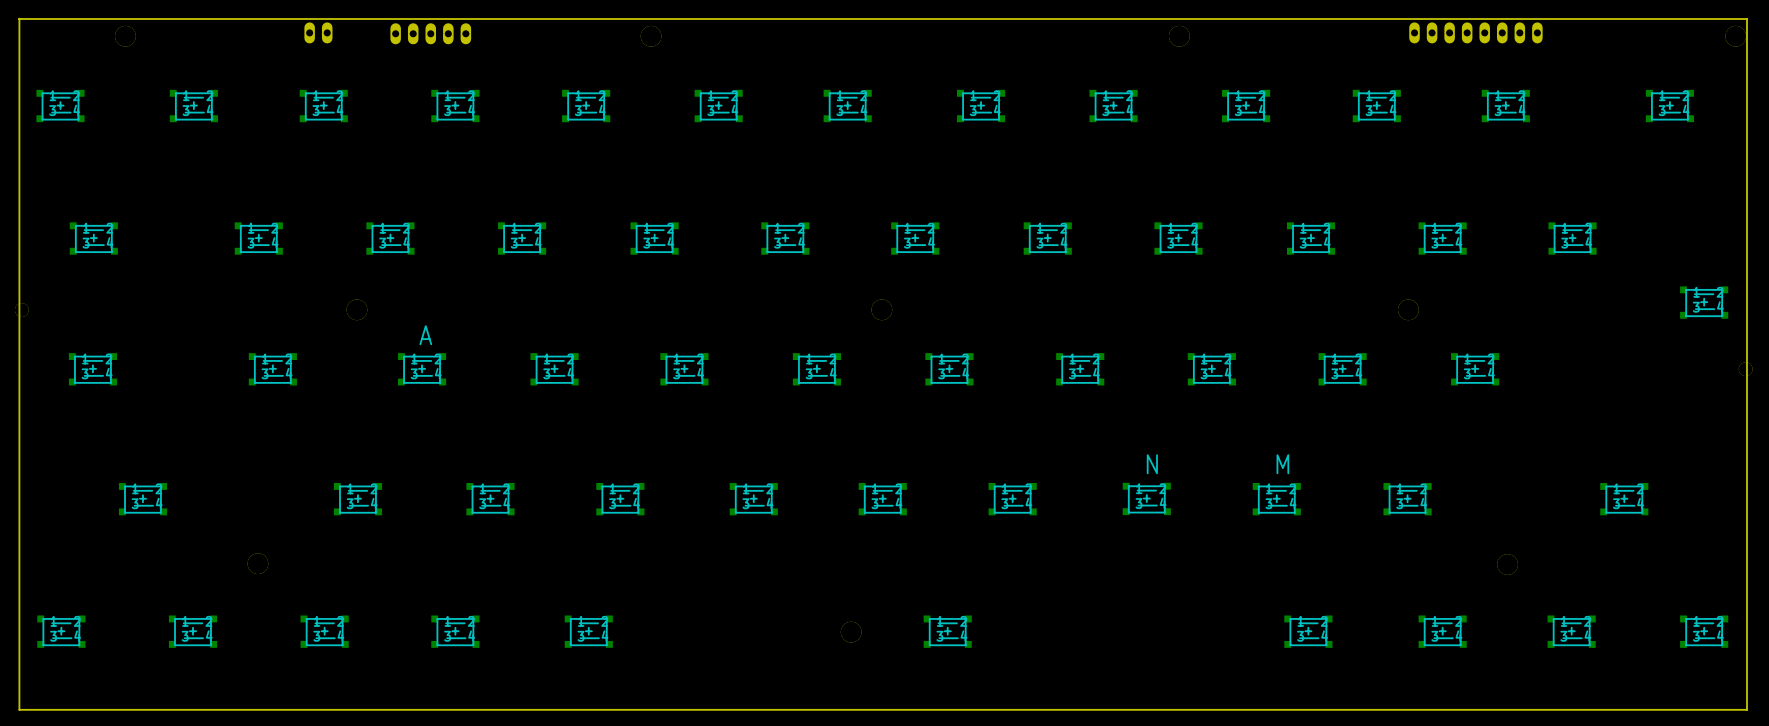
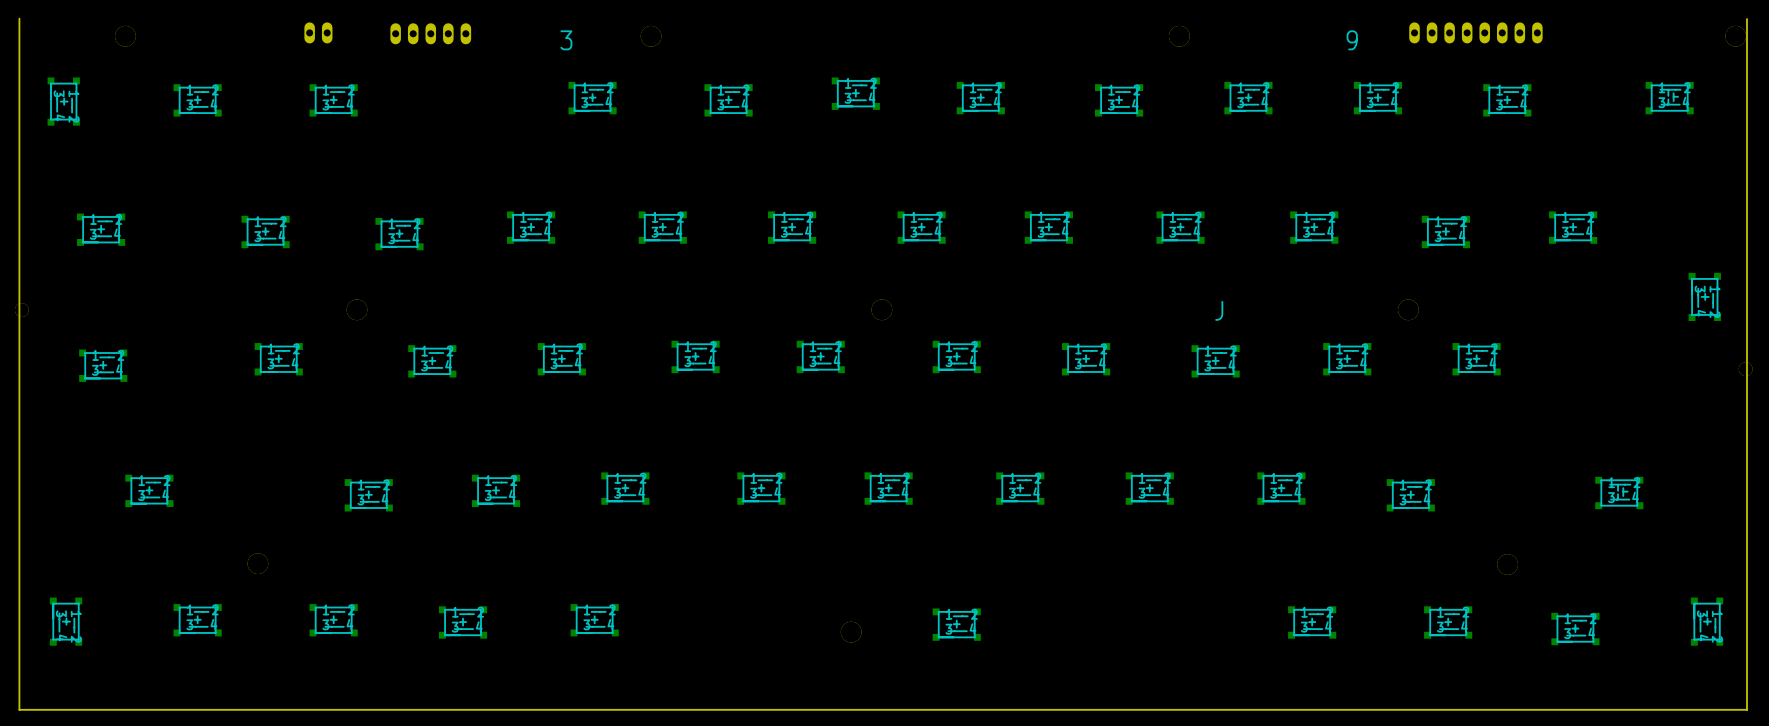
board edge: (1746, 19) (19, 19) -> none
part footprint: [36, 89, 85, 123] -> [47, 77, 80, 126]
part footprint: [169, 89, 218, 123] -> [173, 84, 222, 117]
part footprint: [1481, 89, 1530, 123] -> [1483, 84, 1532, 117]
part: none -> (855, 93)
3: none -> (592, 98)
part: none -> (980, 98)
part: none -> (1248, 98)
9: none -> (1377, 98)
part: none -> (1669, 98)
part: none -> (333, 100)
part: none -> (728, 100)
part: none -> (1119, 100)
part: (323, 106) -> none
part: (455, 106) -> none
part: (586, 106) -> none
part: (718, 106) -> none
part: (847, 106) -> none
part: (981, 106) -> none
part: (1113, 106) -> none
part: (1246, 106) -> none
part: (1376, 106) -> none
part: (1669, 106) -> none
part: none -> (531, 227)
part: none -> (662, 227)
part: none -> (792, 227)
part: none -> (921, 227)
part: none -> (1048, 227)
part: none -> (1180, 227)
part: none -> (1314, 227)
part: none -> (1573, 227)
part: none -> (101, 229)
part: none -> (265, 231)
part: none -> (1445, 231)
part: none -> (399, 234)
part: (93, 238) -> none
part: (258, 238) -> none
part: (390, 238) -> none
part: (522, 238) -> none
part: (654, 238) -> none
part: (785, 238) -> none
part: (915, 238) -> none
part: (1047, 238) -> none
part: (1178, 238) -> none
part: (1311, 238) -> none
part: (1442, 238) -> none
part: (1572, 238) -> none
part footprint: [1680, 286, 1729, 319] -> [1688, 272, 1721, 322]
part: none -> (695, 356)
part: none -> (820, 356)
part: none -> (956, 356)
part: none -> (278, 359)
part: none -> (561, 359)
part: none -> (1086, 359)
part: none -> (1347, 359)
part: none -> (1476, 359)
part: none -> (432, 361)
J: none -> (1215, 361)
part: none -> (103, 365)
part: (92, 369) -> none
part: (272, 369) -> none
A: (422, 369) -> none
part: (554, 369) -> none
part: (684, 369) -> none
part: (816, 369) -> none
part: (949, 369) -> none
part: (1080, 369) -> none
part: (1211, 369) -> none
part: (1342, 369) -> none
part: (1475, 369) -> none
part footprint: [1383, 482, 1432, 516] -> [1386, 479, 1435, 512]
part: none -> (625, 488)
part: none -> (761, 488)
part: none -> (888, 488)
part: none -> (1020, 488)
part: none -> (1149, 488)
part: none -> (1281, 488)
part: none -> (149, 490)
part: none -> (496, 490)
part: none -> (1619, 492)
part: none -> (368, 495)
N: (1146, 498) -> none
part: (142, 499) -> none
part: (357, 499) -> none
part: (490, 499) -> none
part: (620, 499) -> none
part: (753, 499) -> none
part: (882, 499) -> none
part: (1012, 499) -> none
M: (1276, 499) -> none
part: (1624, 499) -> none
part footprint: [1547, 615, 1596, 648] -> [1551, 612, 1600, 646]
part: none -> (197, 620)
part: none -> (333, 620)
part: none -> (594, 620)
part: none -> (66, 621)
part: none -> (1707, 621)
part: none -> (463, 622)
part: none -> (1312, 622)
part: none -> (1448, 622)
part: none -> (956, 624)
part: (61, 631) -> none
part: (192, 631) -> none
part: (324, 631) -> none
part: (455, 631) -> none
part: (588, 631) -> none
part: (947, 631) -> none
part: (1308, 631) -> none
part: (1442, 631) -> none
part: (1704, 631) -> none

